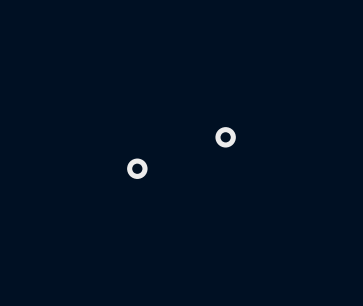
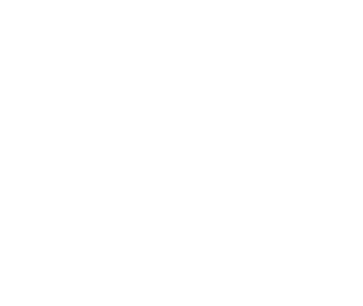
via: (225, 137) -> none
via: (137, 168) -> none

